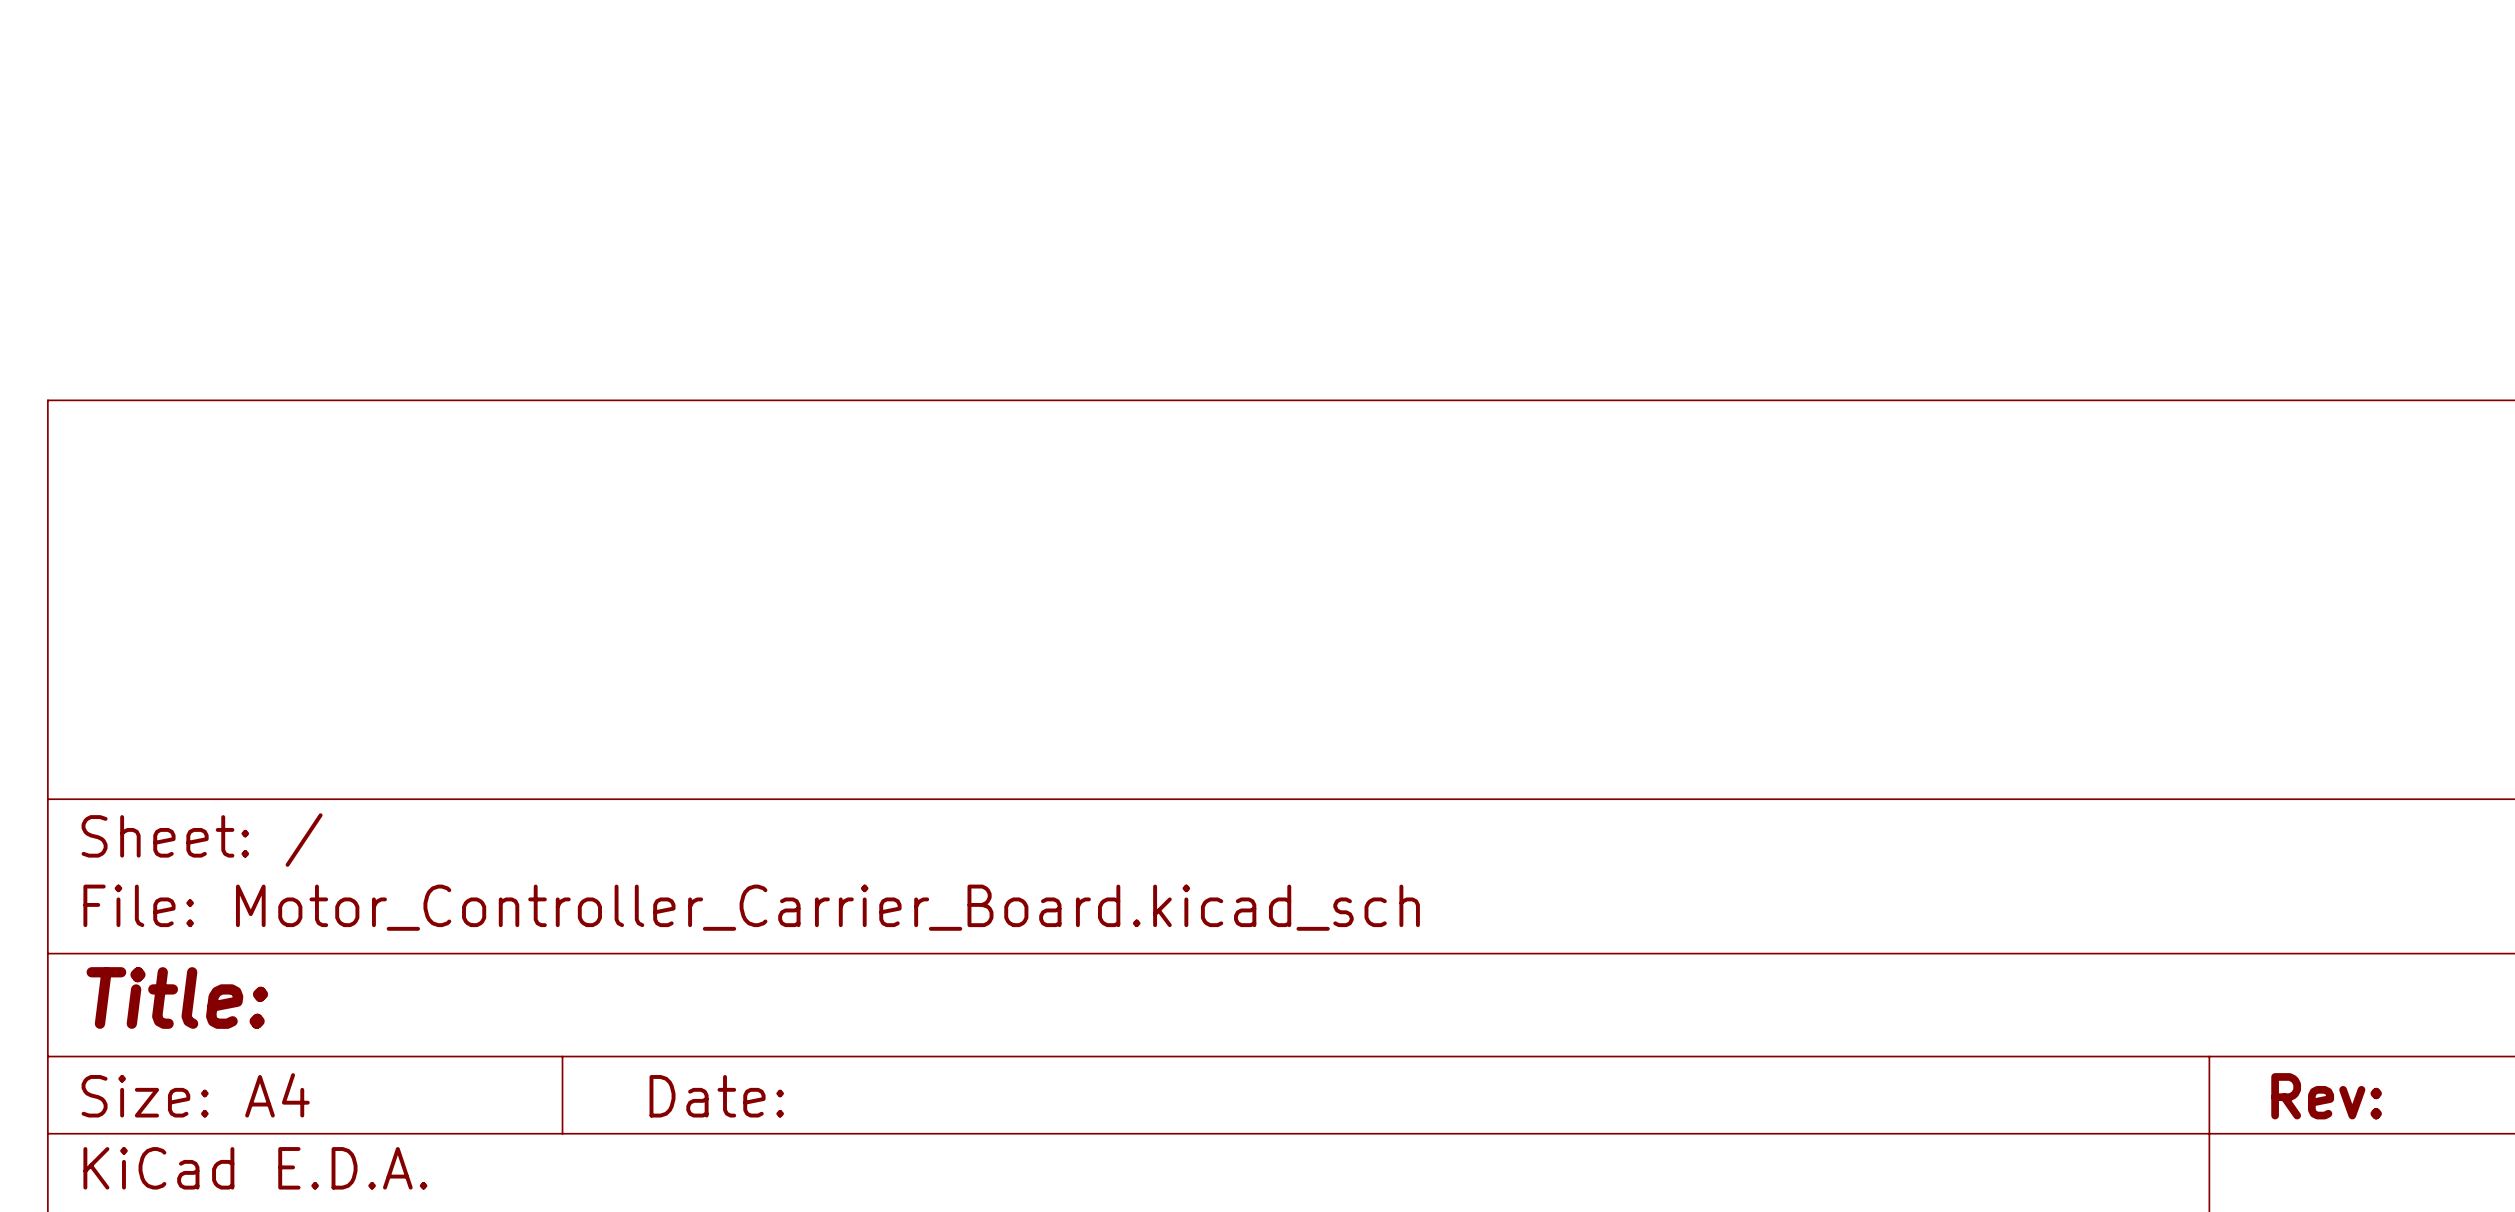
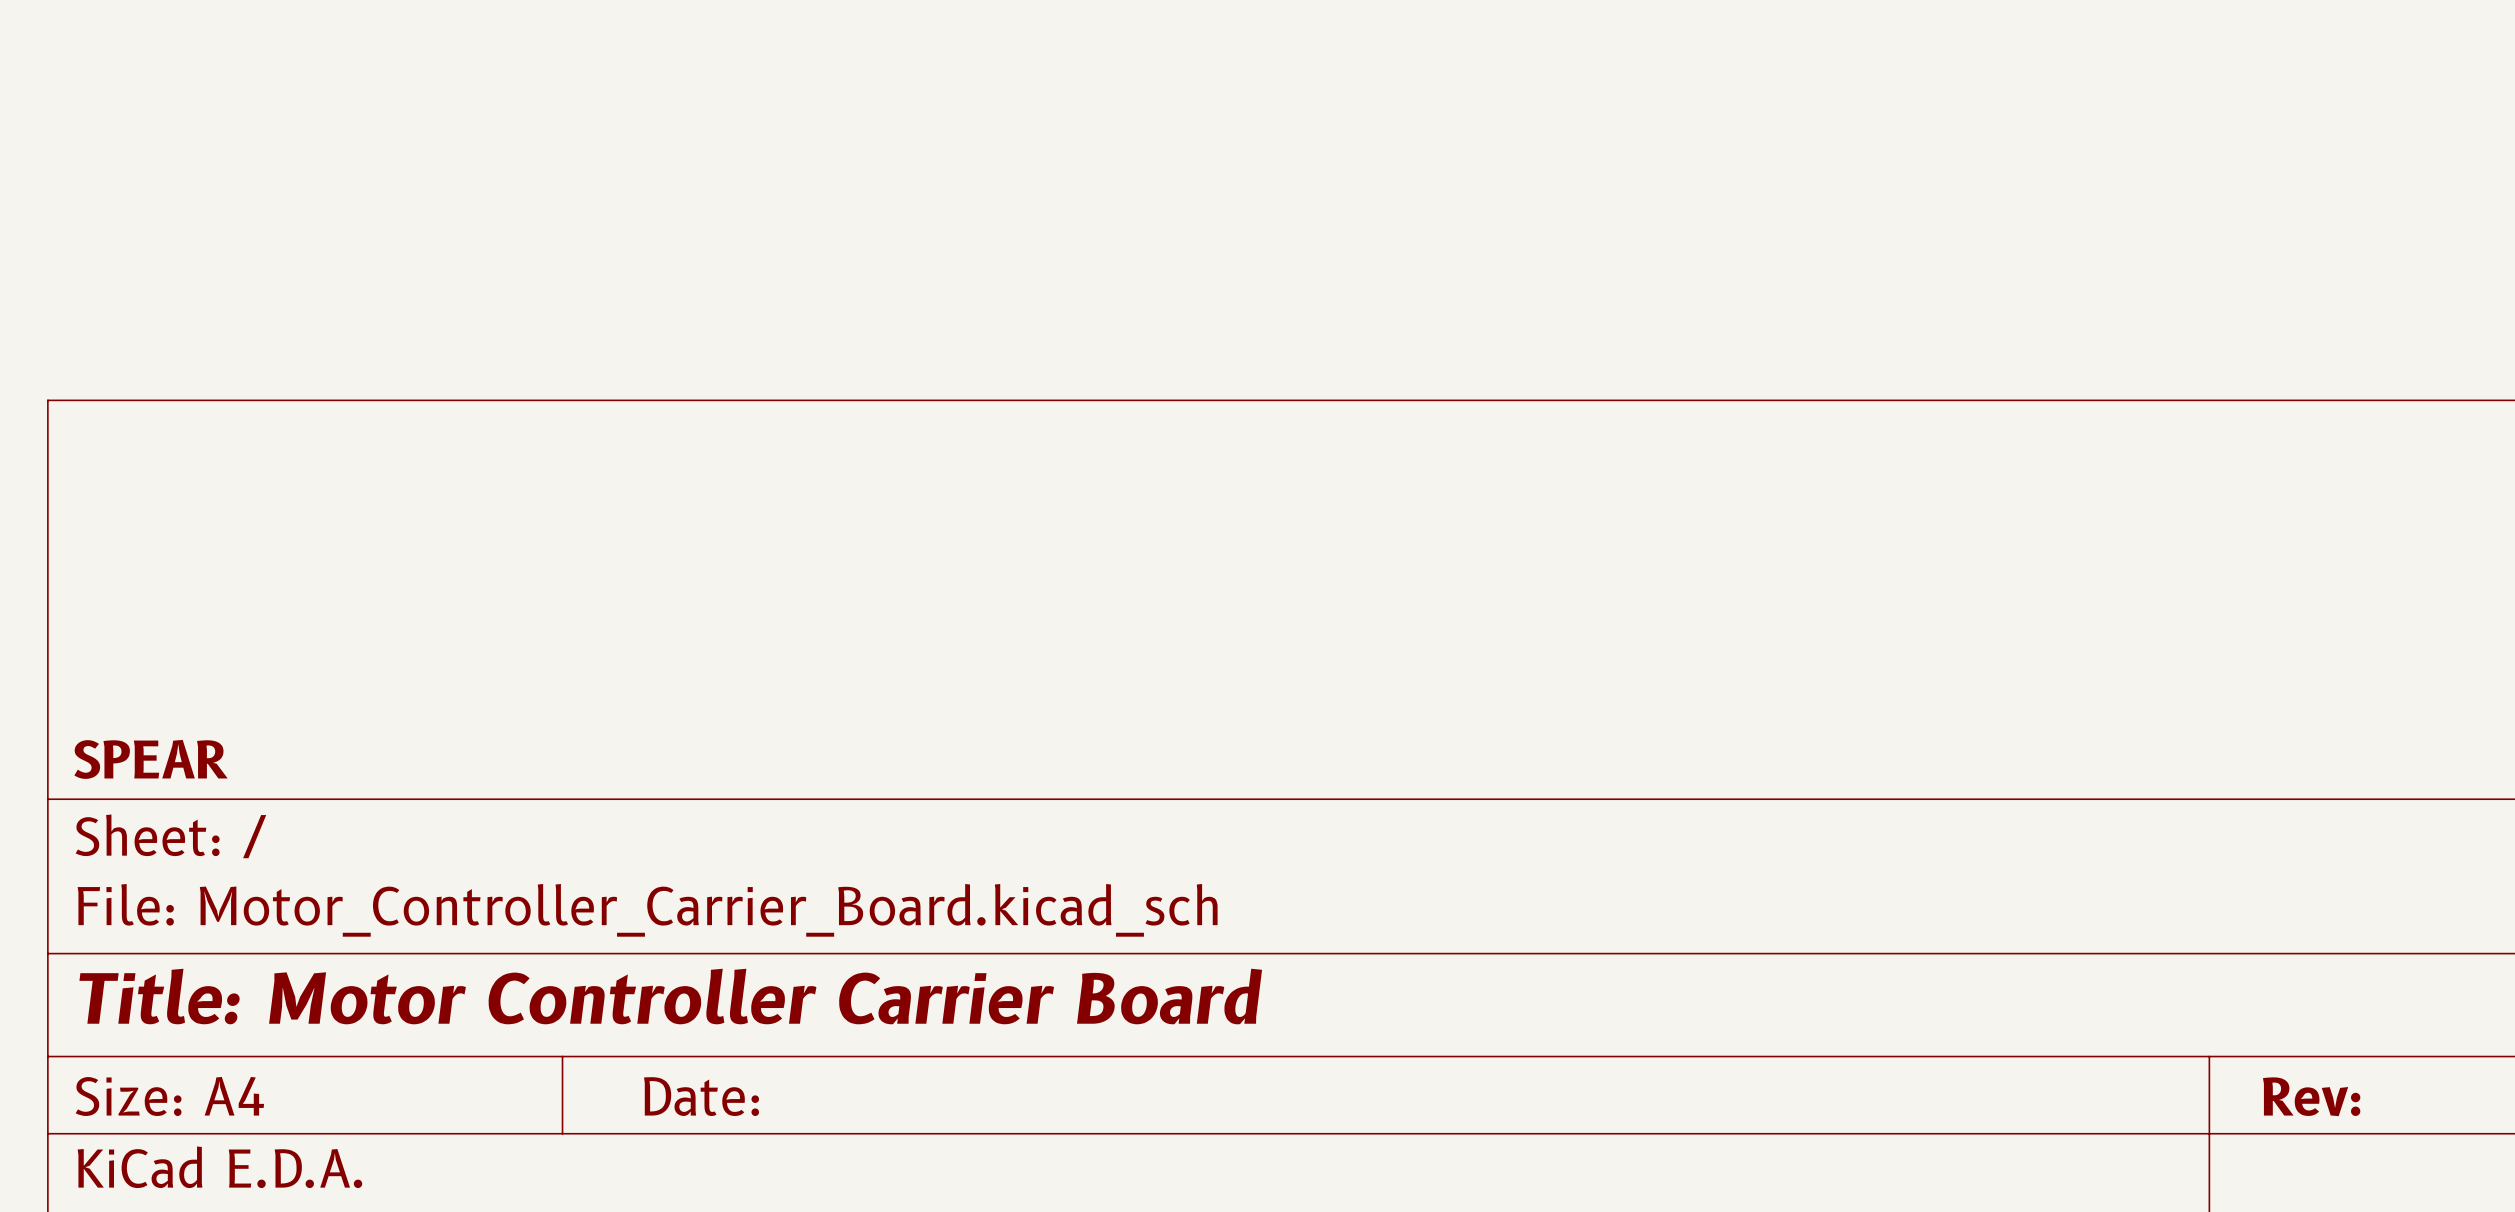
title block: none -> SPEAR (151, 759)
title block: Title: (177, 998) -> Title: Motor Controller Carrier Board (670, 996)

